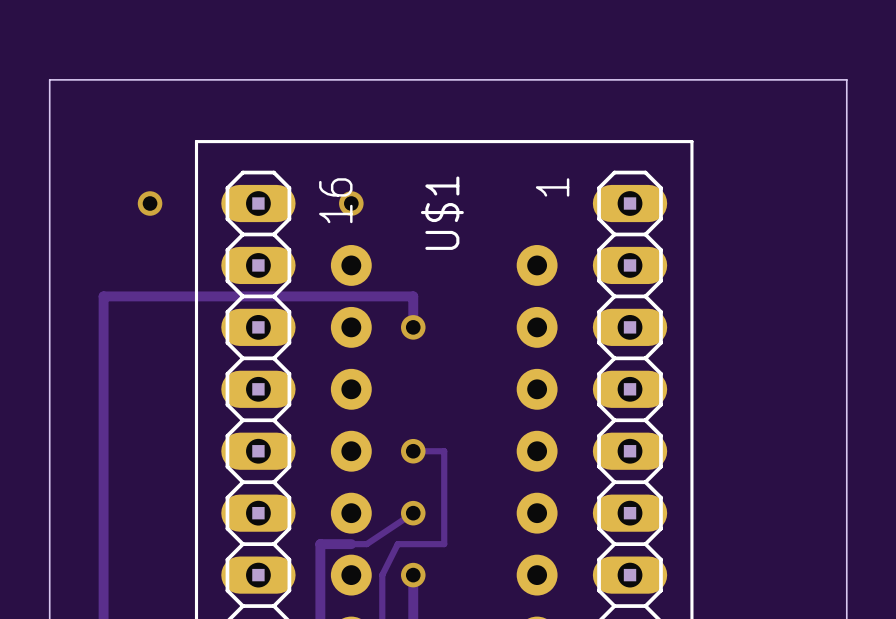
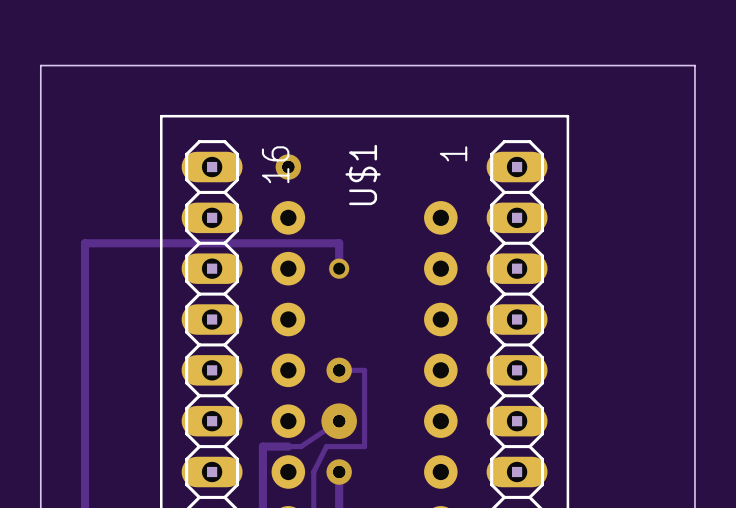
via: (150, 203) -> none
via: none -> (288, 167)
via: none -> (339, 370)
via: none -> (339, 421)
via: none -> (339, 472)

